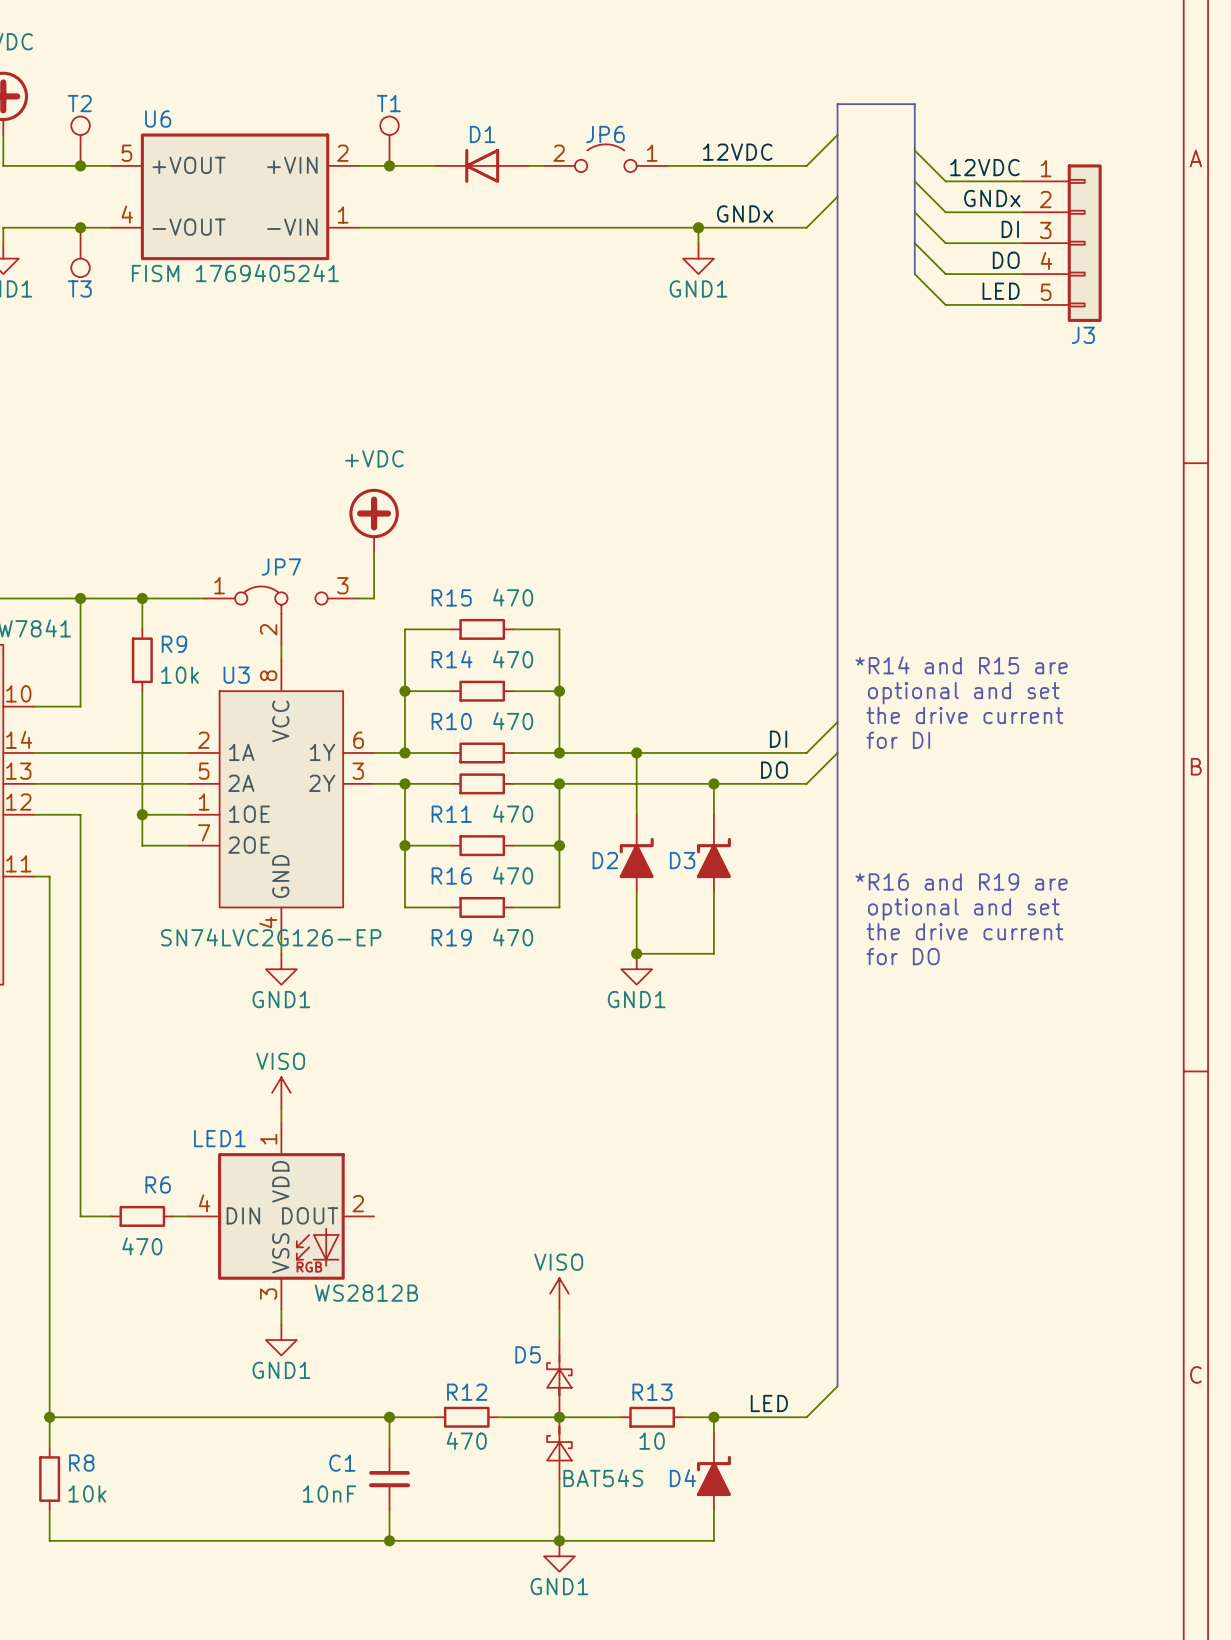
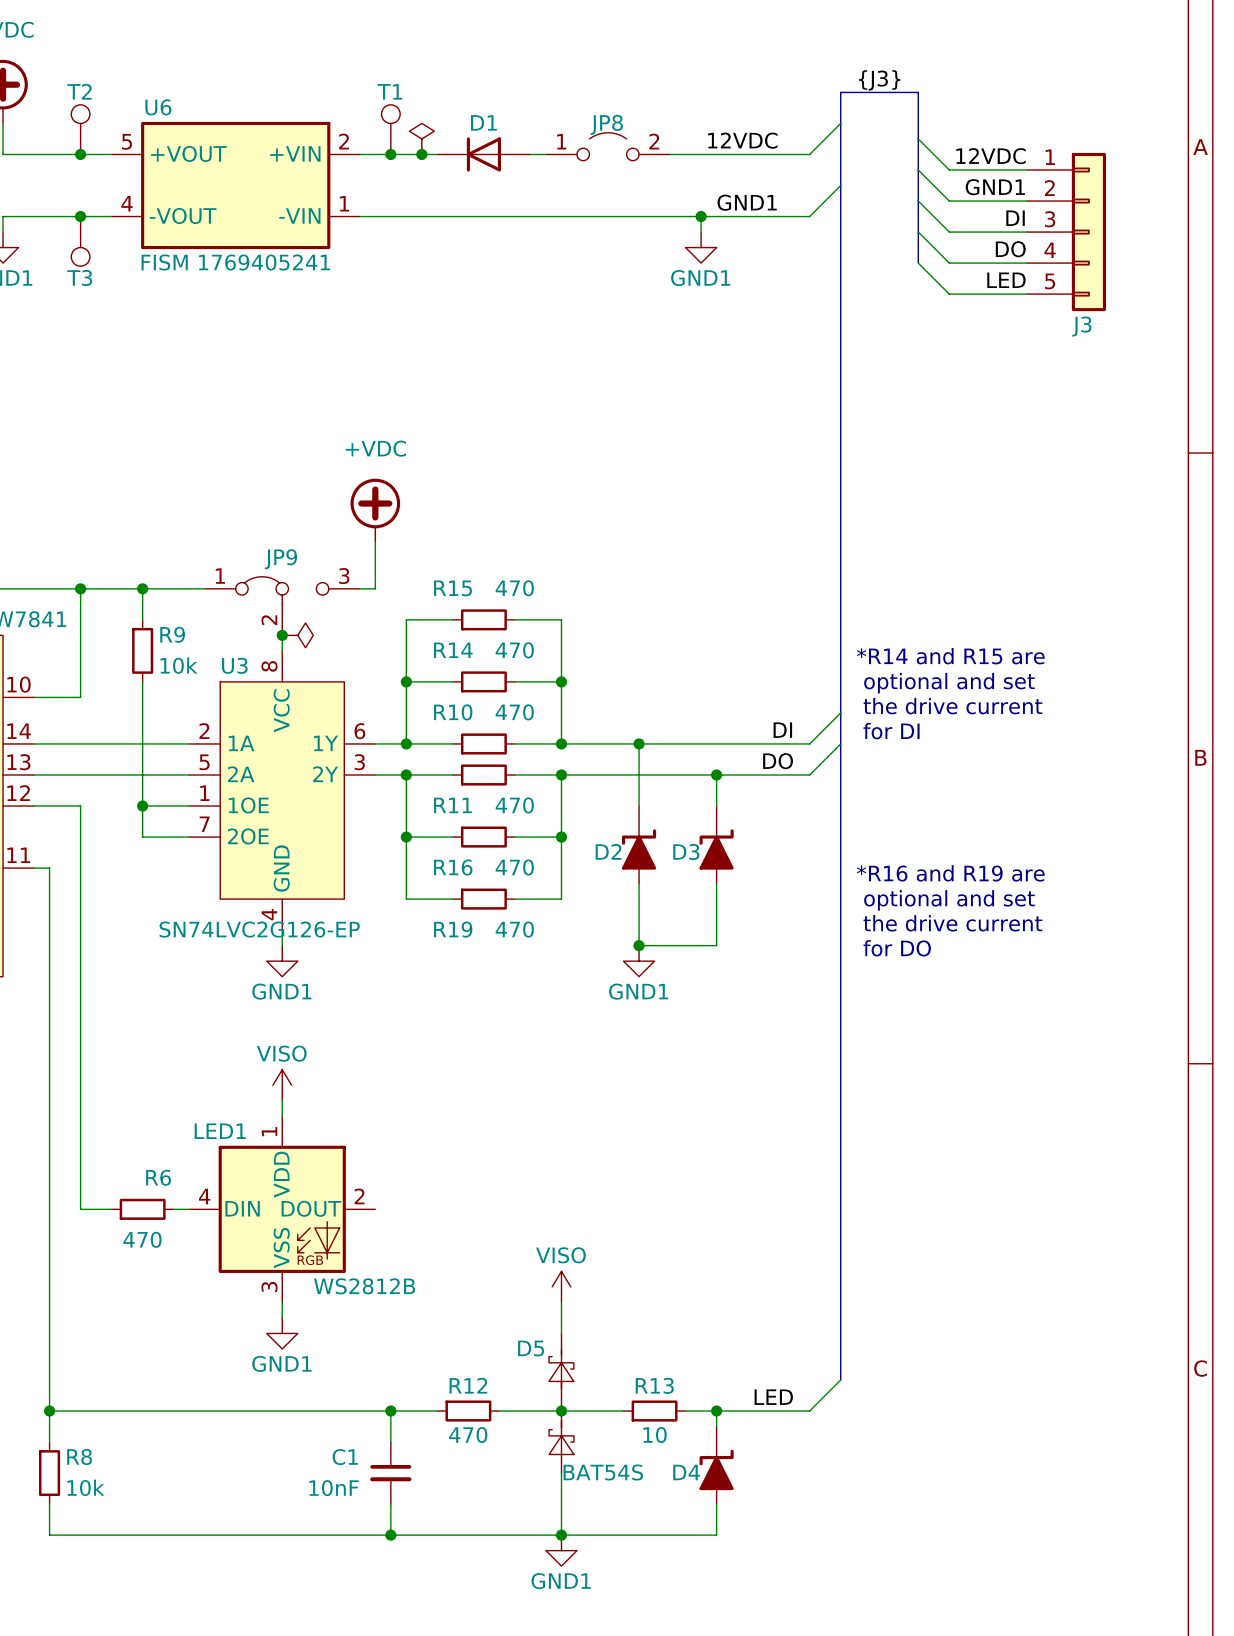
label: none -> {J3} (879, 80)
JP6 name: JP6 (605, 134) -> JP8 (606, 124)
power symbol: none -> (421, 138)
JP6 flip: as is (605, 158) -> left-right (608, 146)
junction: none -> (421, 154)
label: GNDx (992, 198) -> GND1 (995, 187)
label: GNDx (745, 213) -> GND1 (747, 202)
JP7 name: JP7 (281, 567) -> JP9 (280, 559)
junction: none -> (282, 635)
power symbol: none -> (297, 635)

